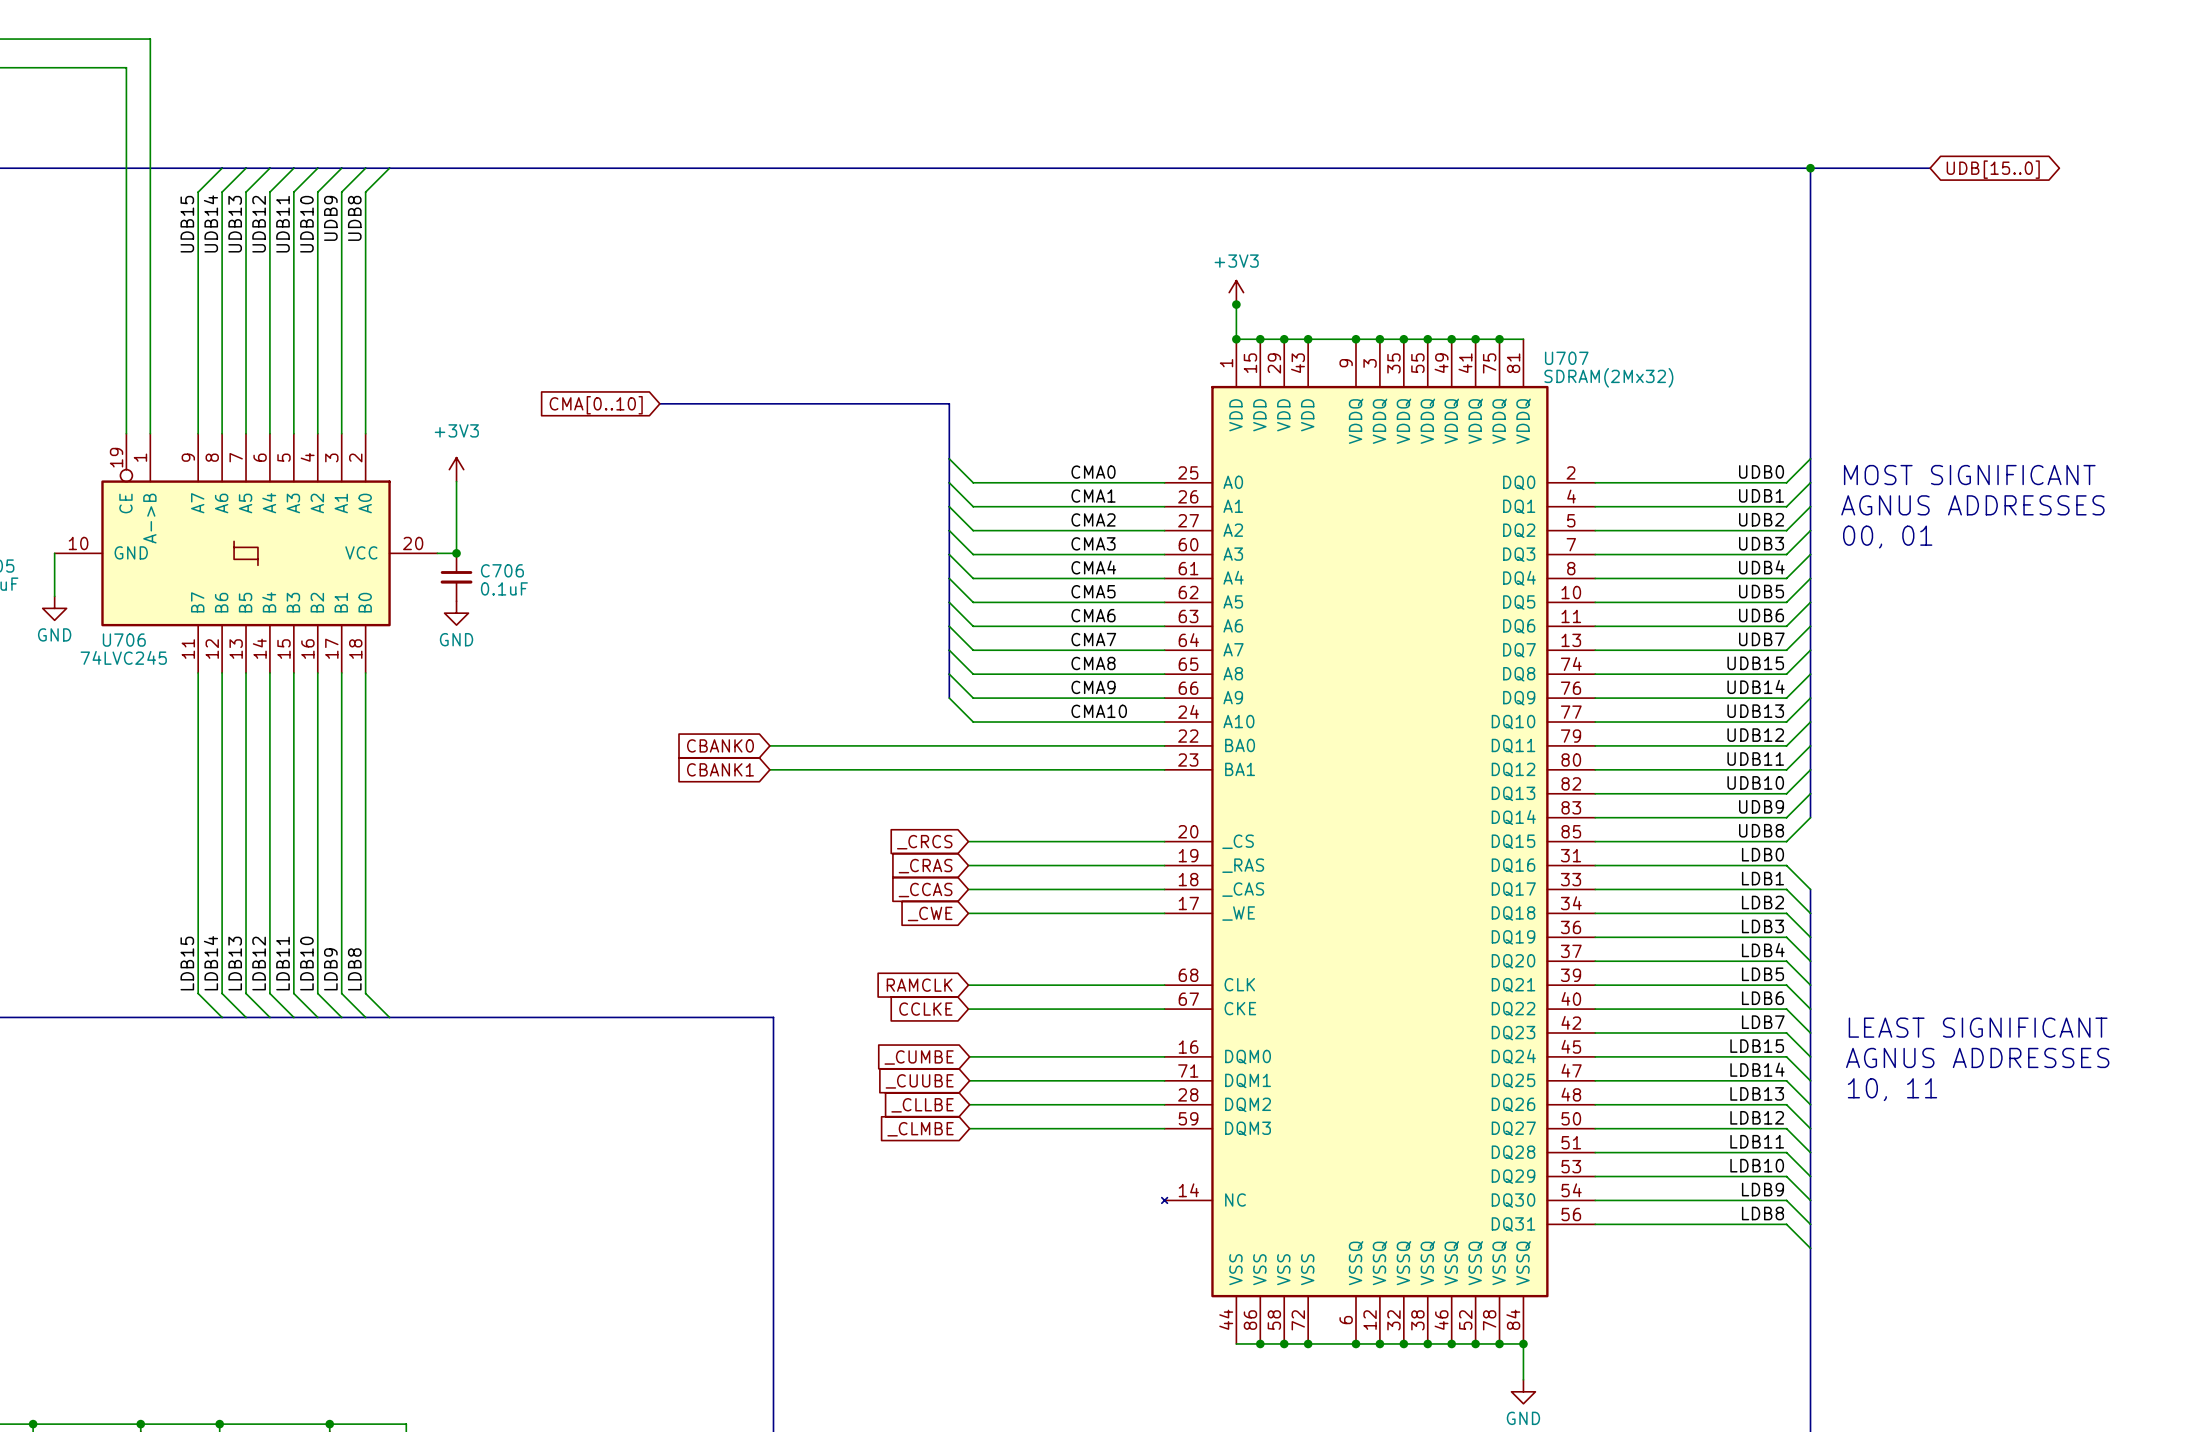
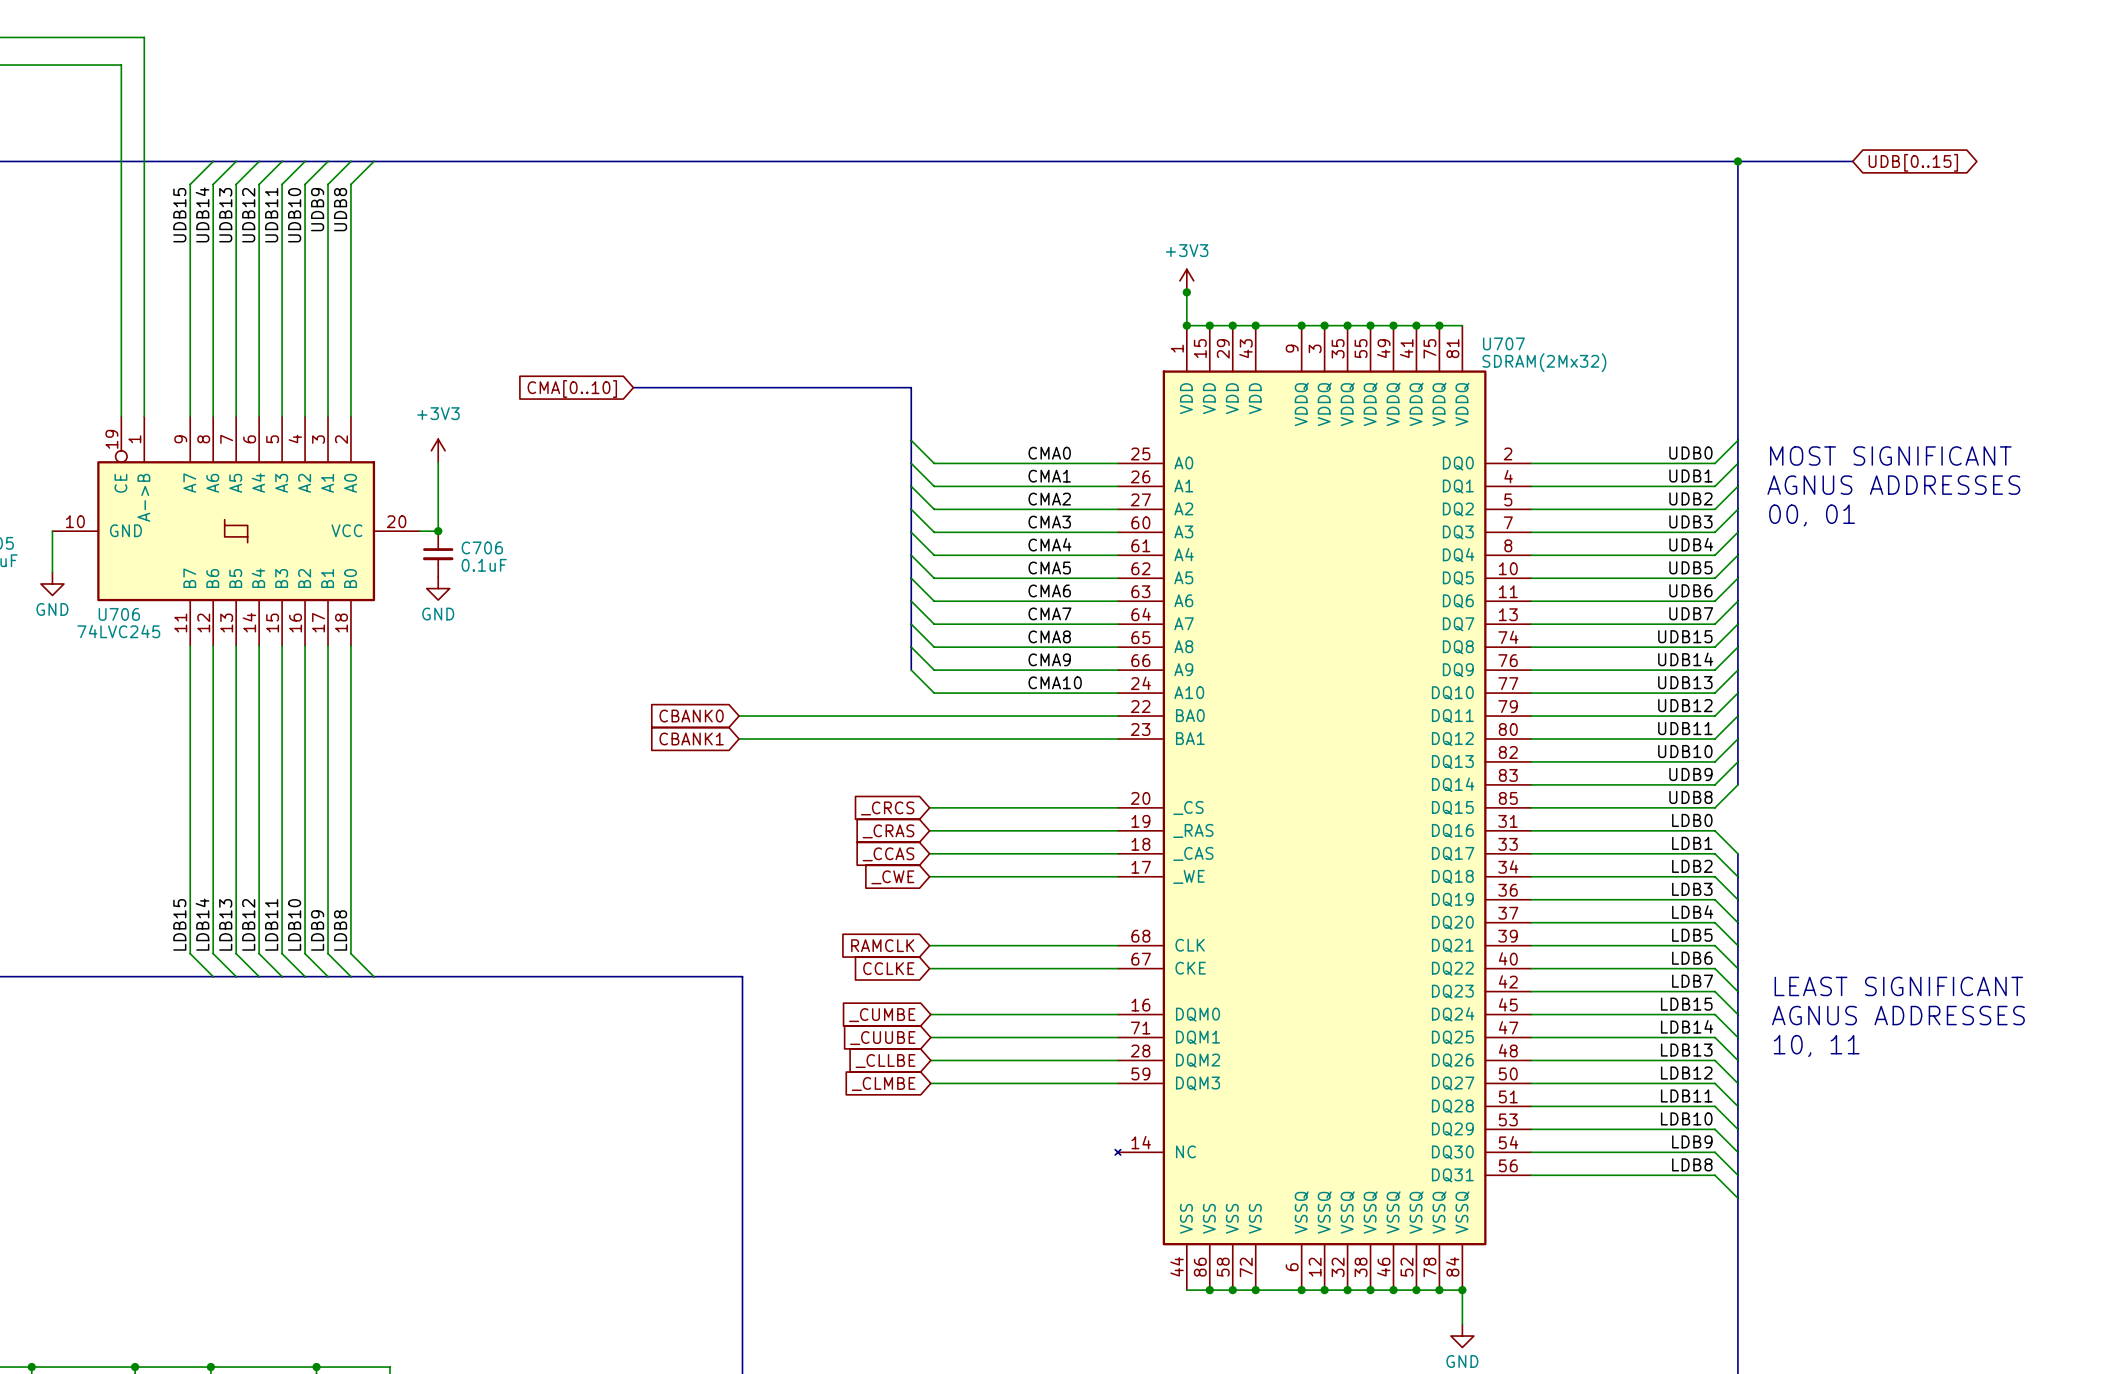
global label: UDB[15..0] (1993, 169) -> UDB[0..15] (1913, 162)

